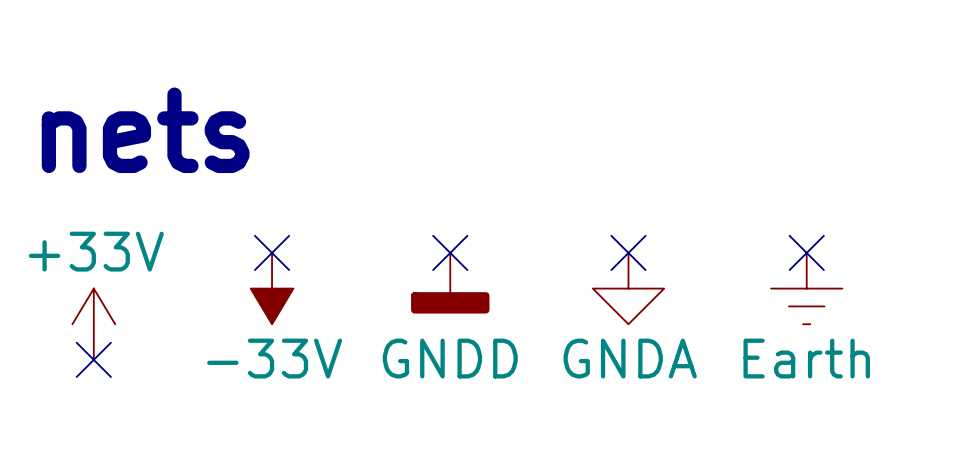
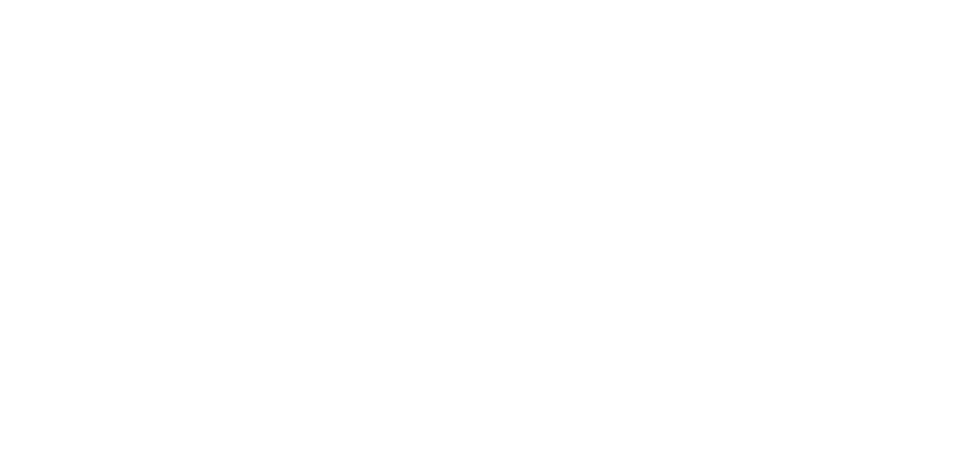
text: nets (145, 130) -> none
no-connect mark: (272, 252) -> none
no-connect mark: (450, 252) -> none
no-connect mark: (628, 252) -> none
no-connect mark: (806, 252) -> none
power symbol: GNDD (450, 283) -> none
power symbol: -33V (272, 288) -> none
power symbol: GNDA (628, 288) -> none
power symbol: Earth (806, 288) -> none
power symbol: +33V (93, 324) -> none
no-connect mark: (93, 359) -> none

